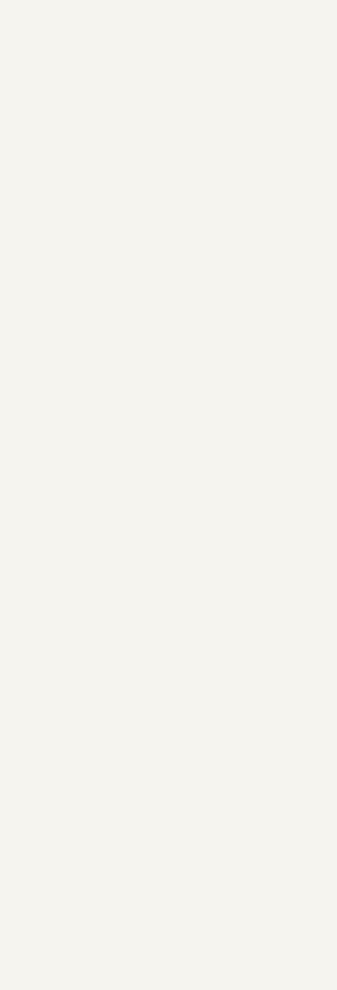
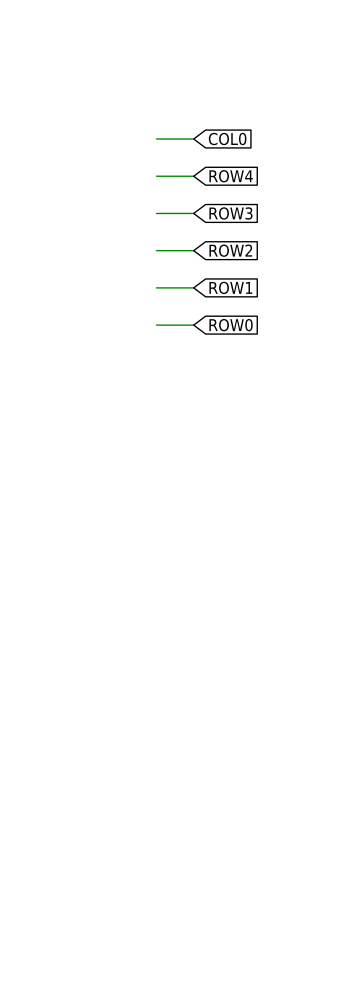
wire: none -> (156, 139) (193, 139)
global label: none -> COL0 (227, 139)
global label: none -> ROW4 (231, 176)
wire: none -> (156, 176) (193, 176)
wire: none -> (156, 213) (193, 213)
global label: none -> ROW3 (230, 213)
wire: none -> (156, 250) (193, 250)
global label: none -> ROW2 (230, 250)
wire: none -> (156, 287) (193, 287)
global label: none -> ROW1 (230, 287)
wire: none -> (156, 325) (193, 325)
global label: none -> ROW0 (231, 325)

